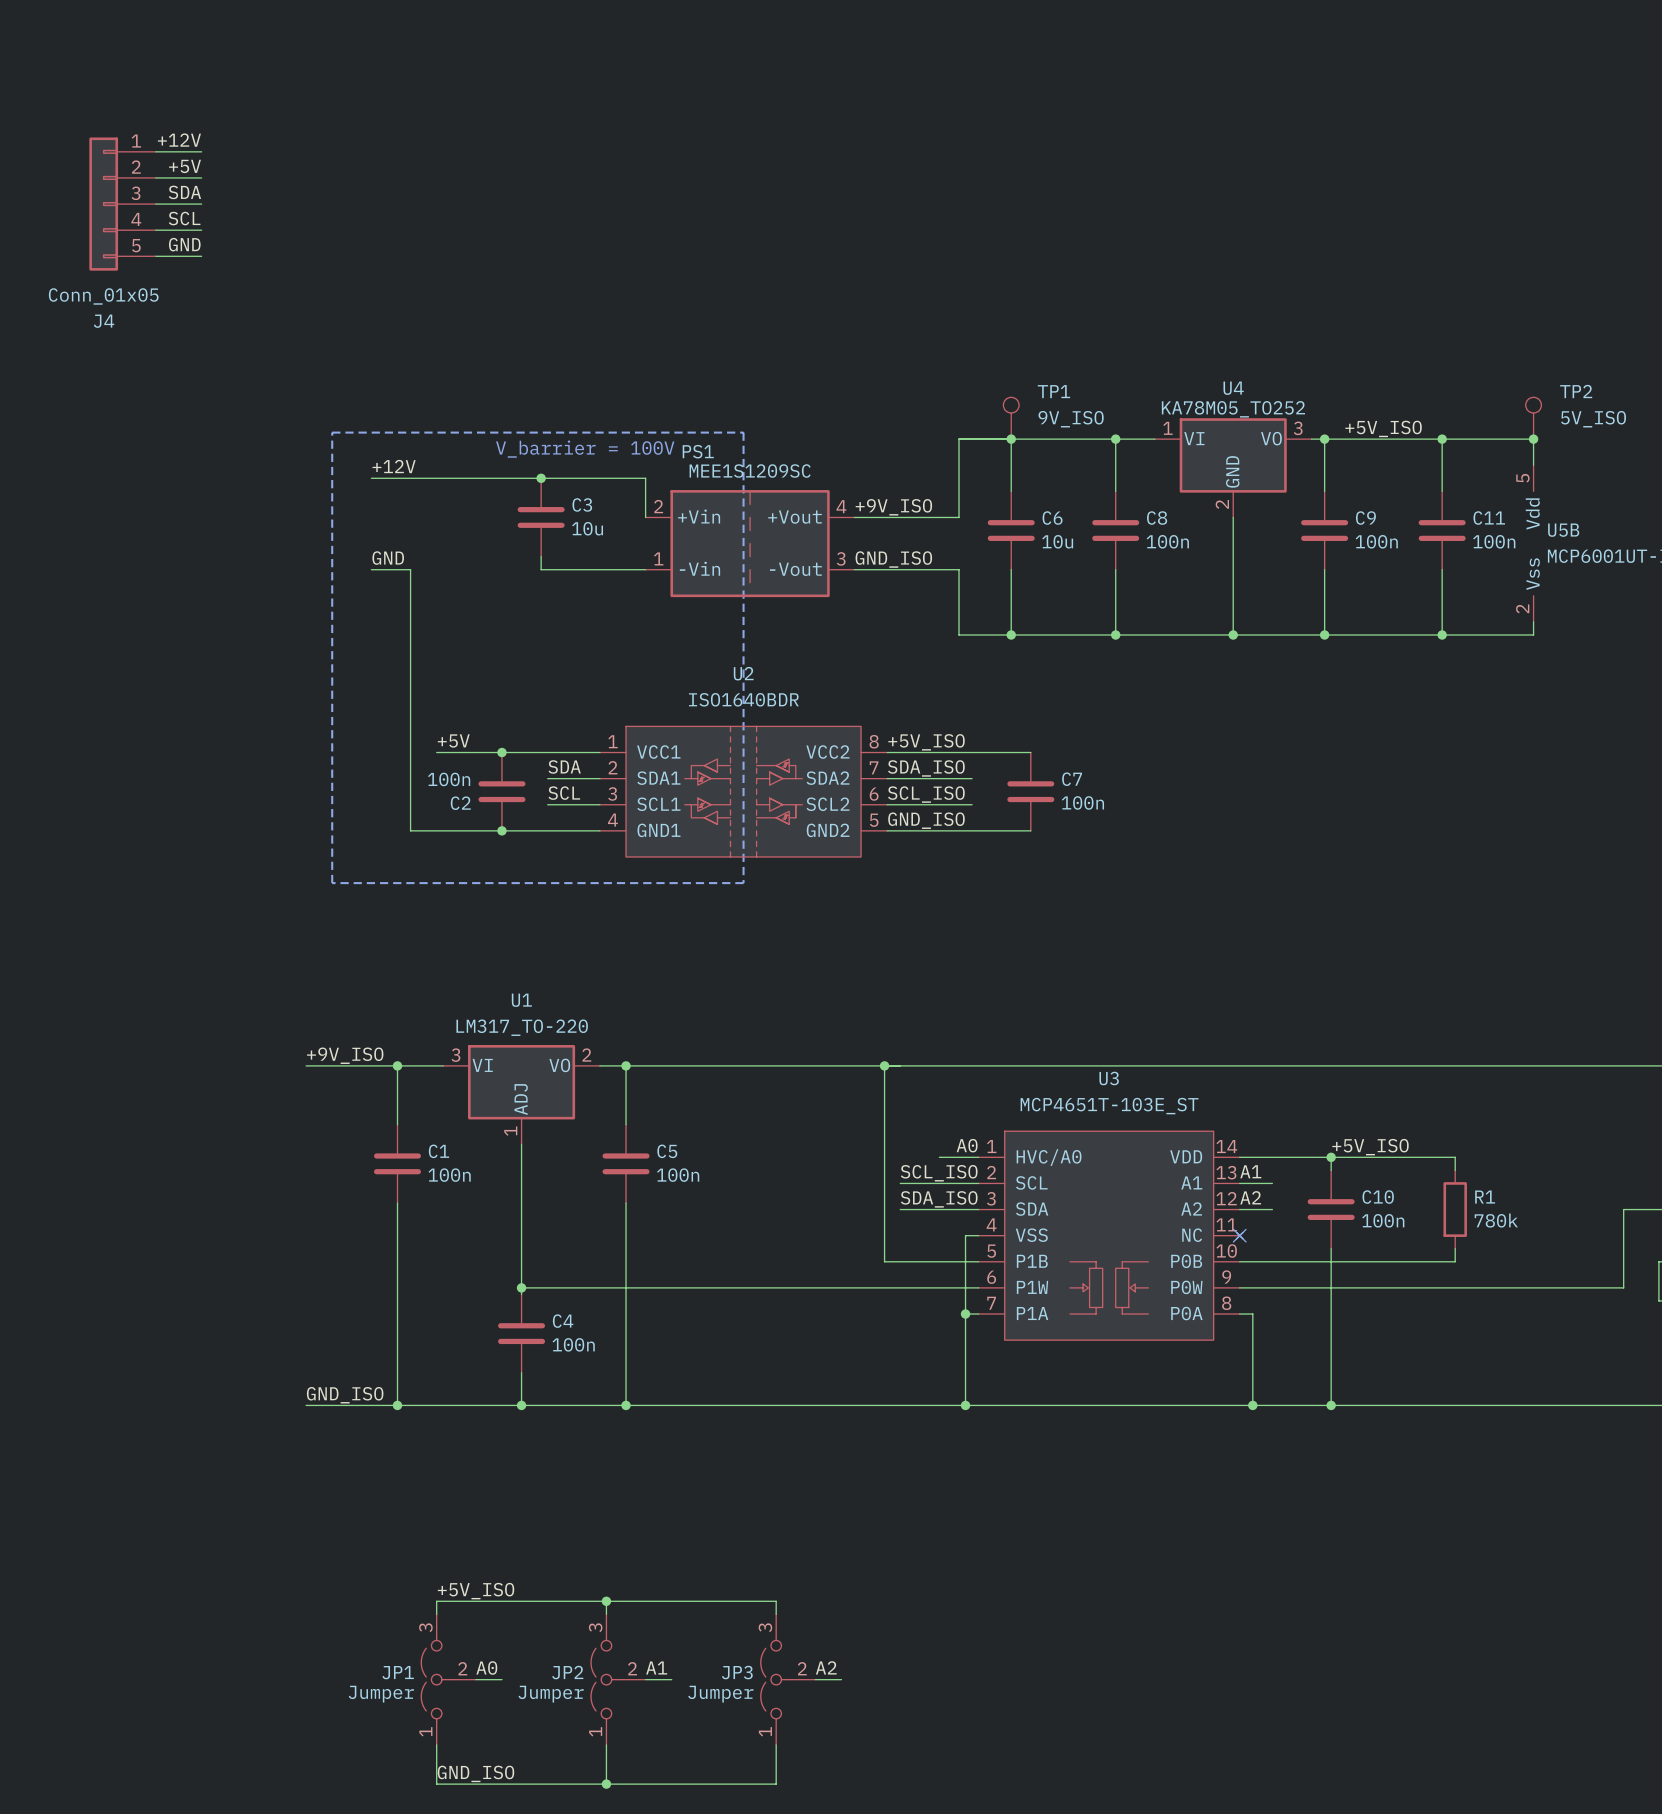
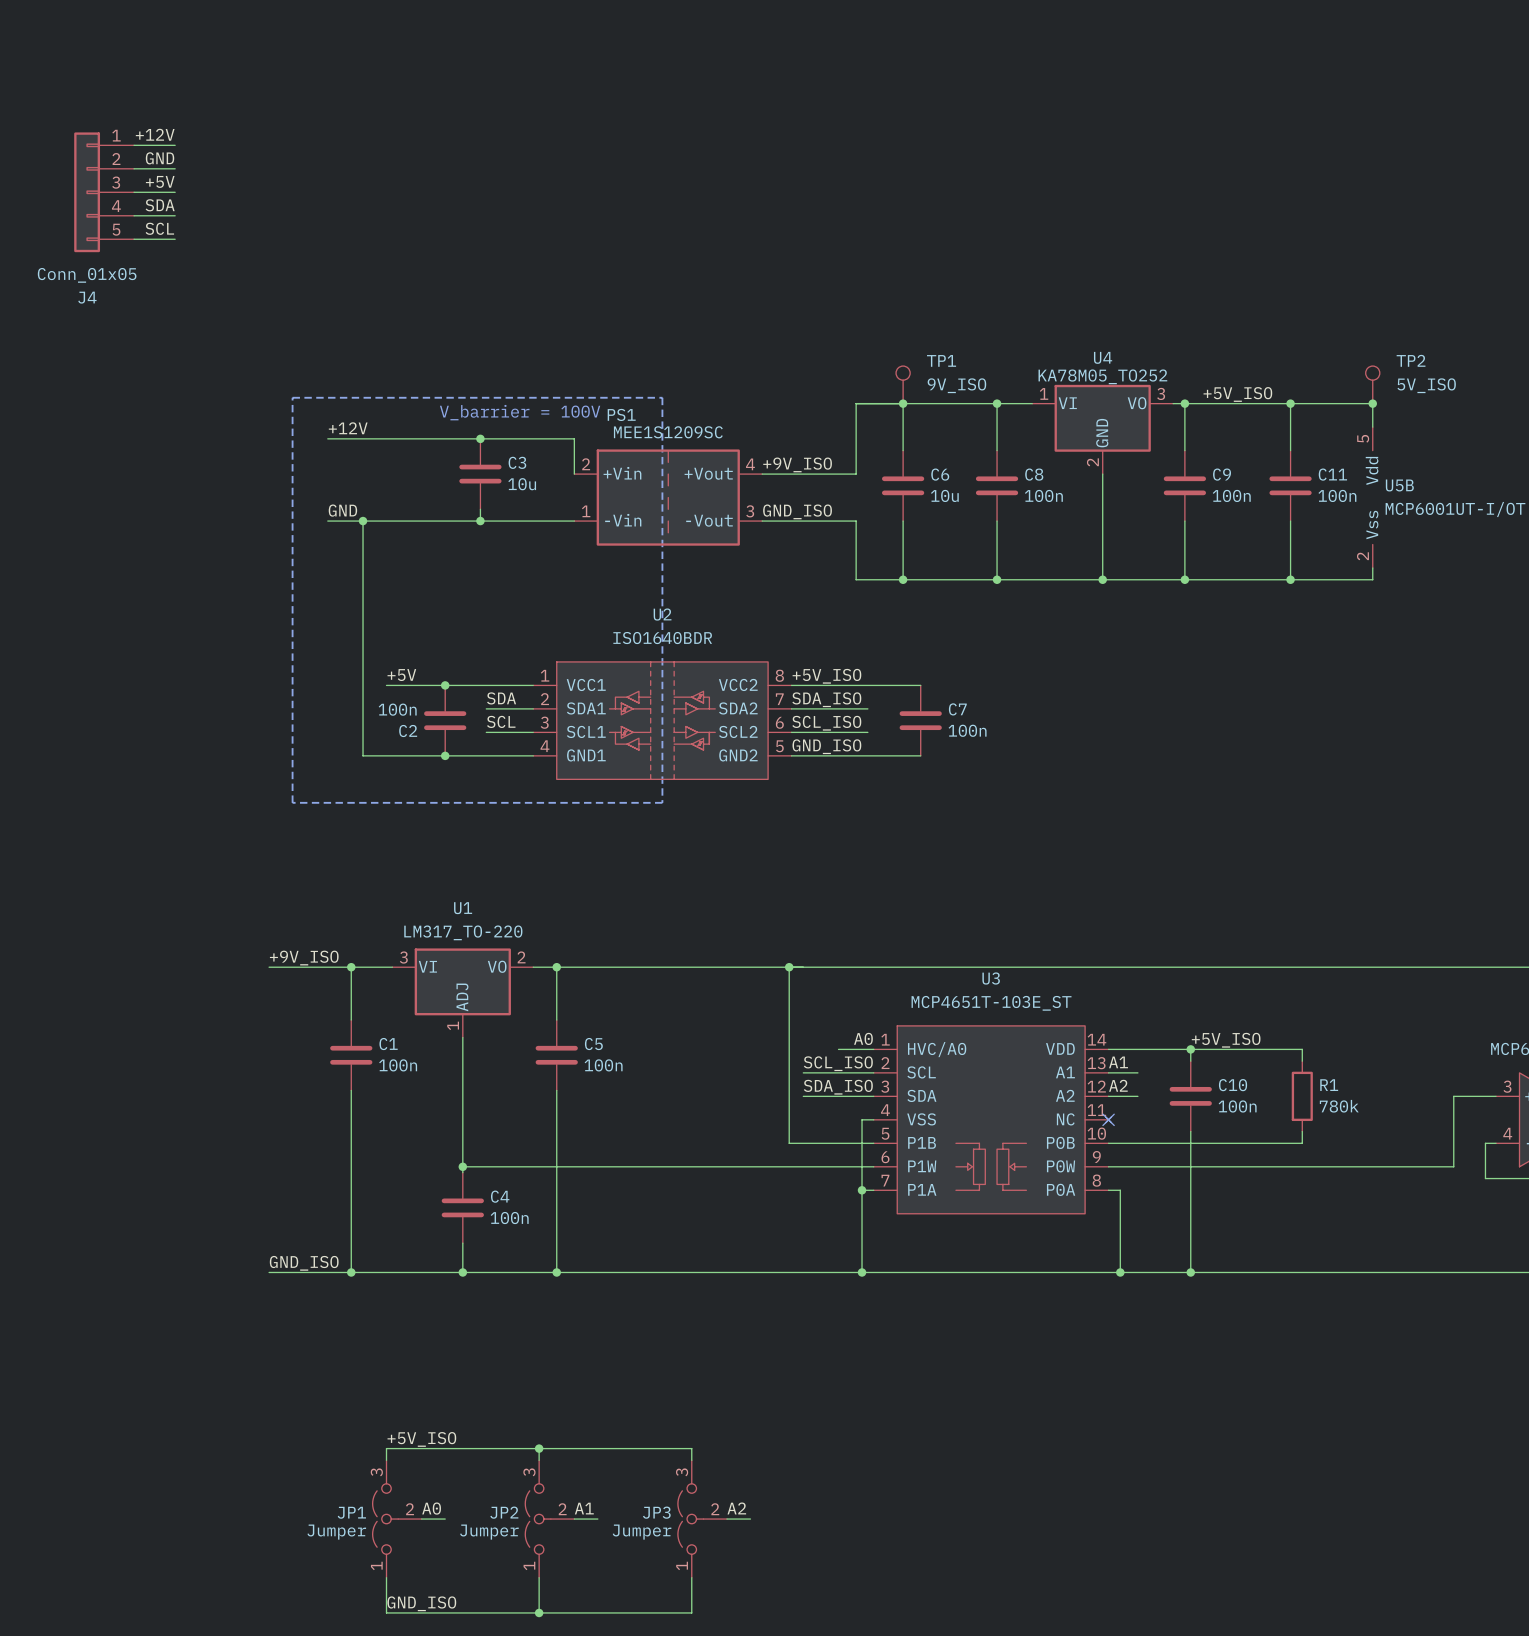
label: +5V (185, 166) -> GND (160, 158)
label: SDA (184, 192) -> +5V (160, 181)
label: SCL (184, 218) -> SDA (160, 205)
label: GND (184, 244) -> SCL (159, 228)
wire: none -> (363, 521) (480, 521)
junction: none -> (363, 521)
junction: none -> (480, 521)

